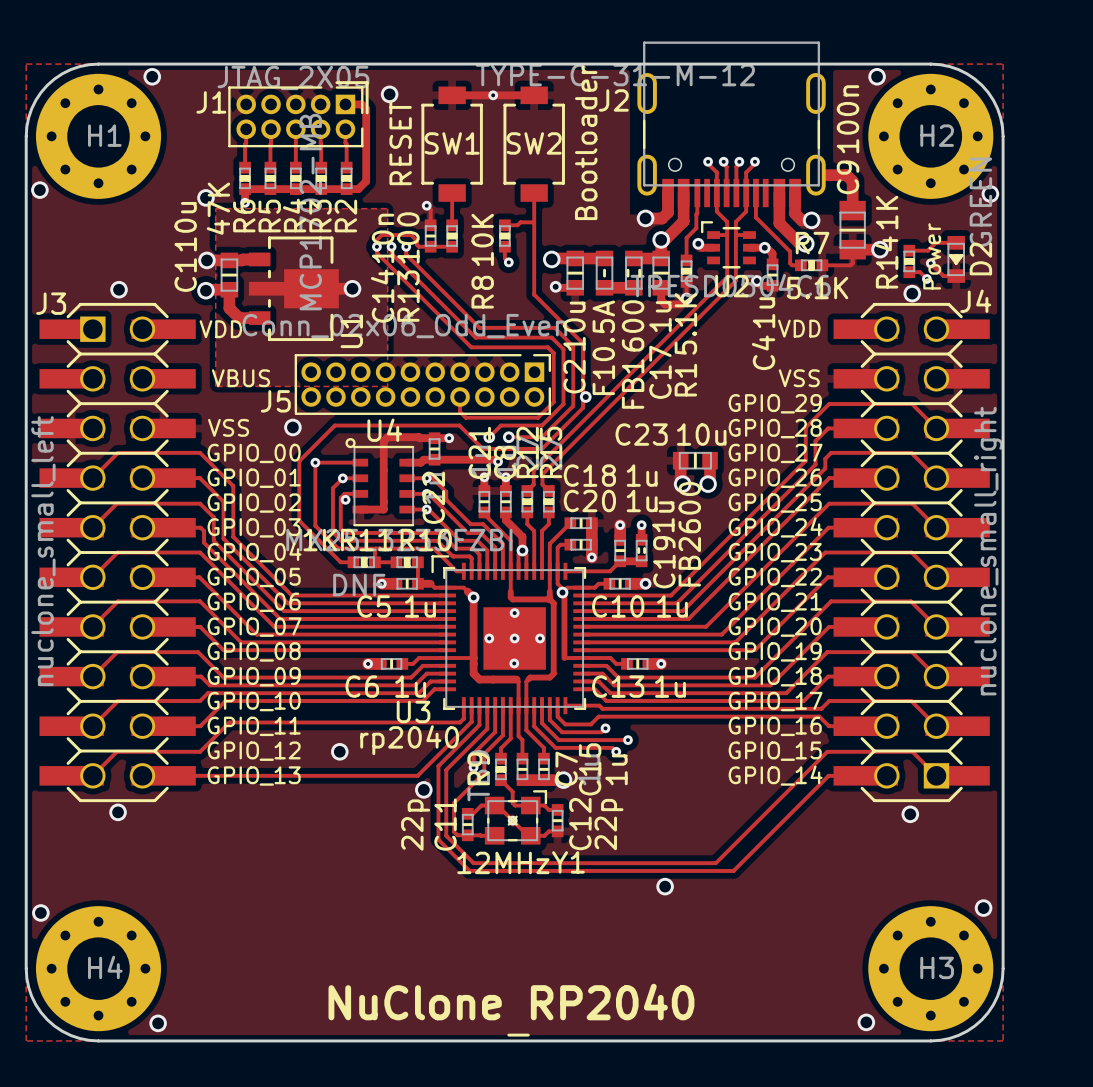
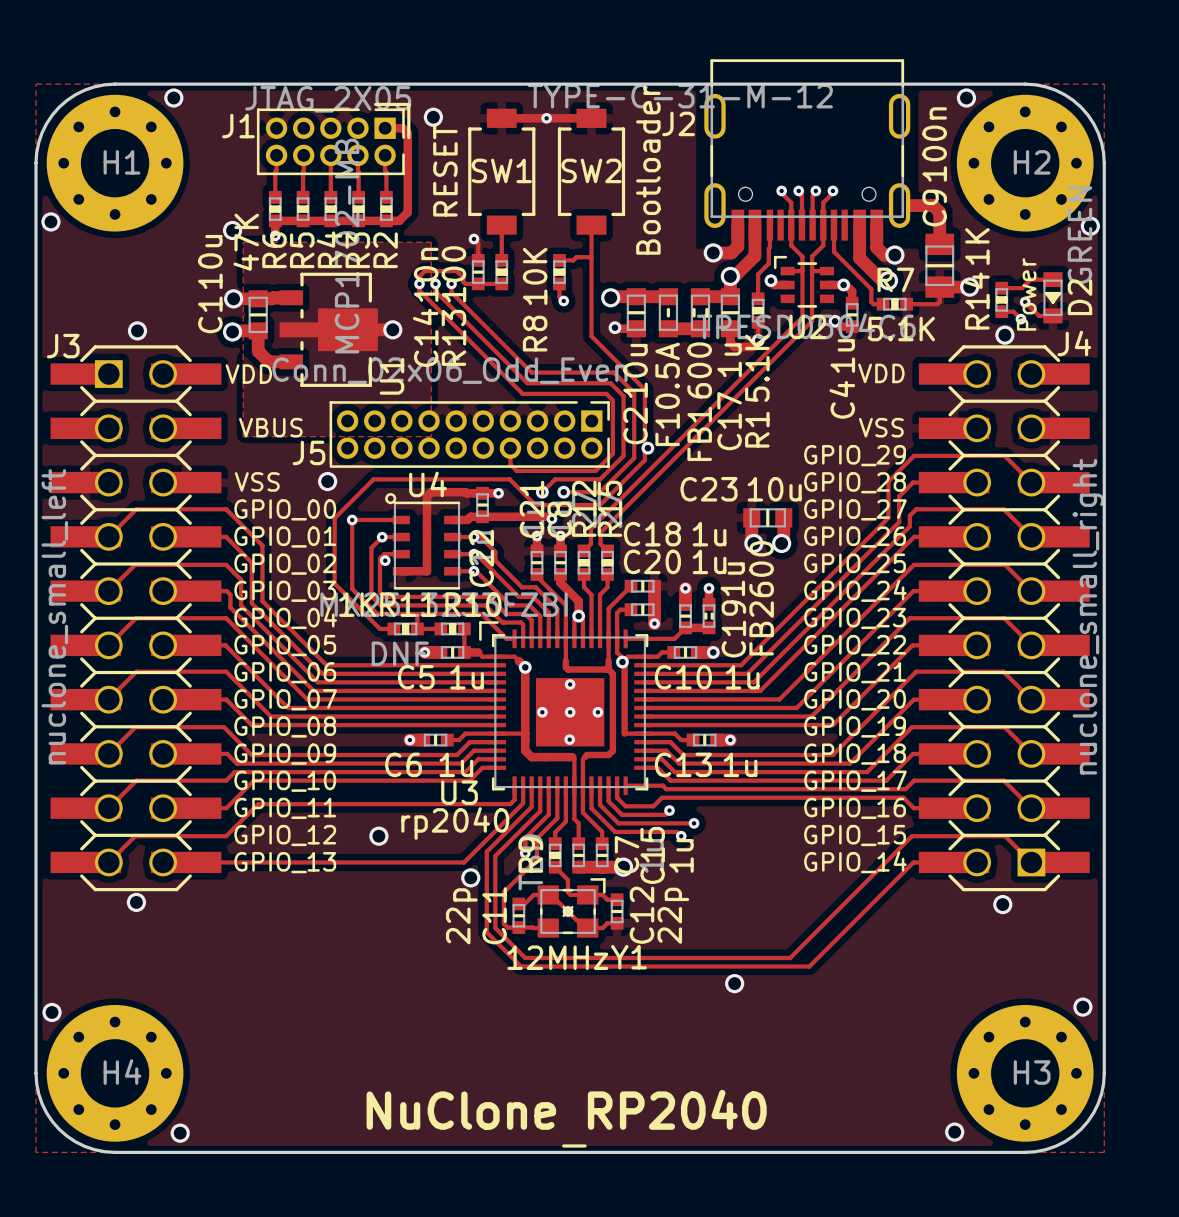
J2 footprint: [637, 41, 826, 208] -> [704, 59, 911, 241]

